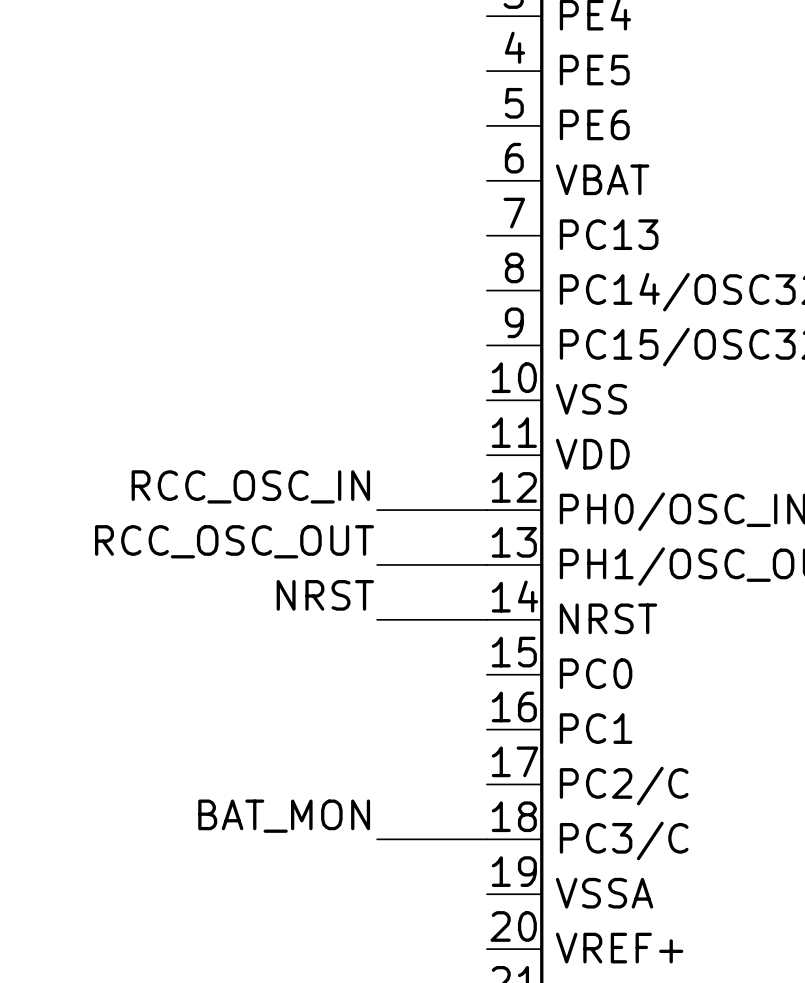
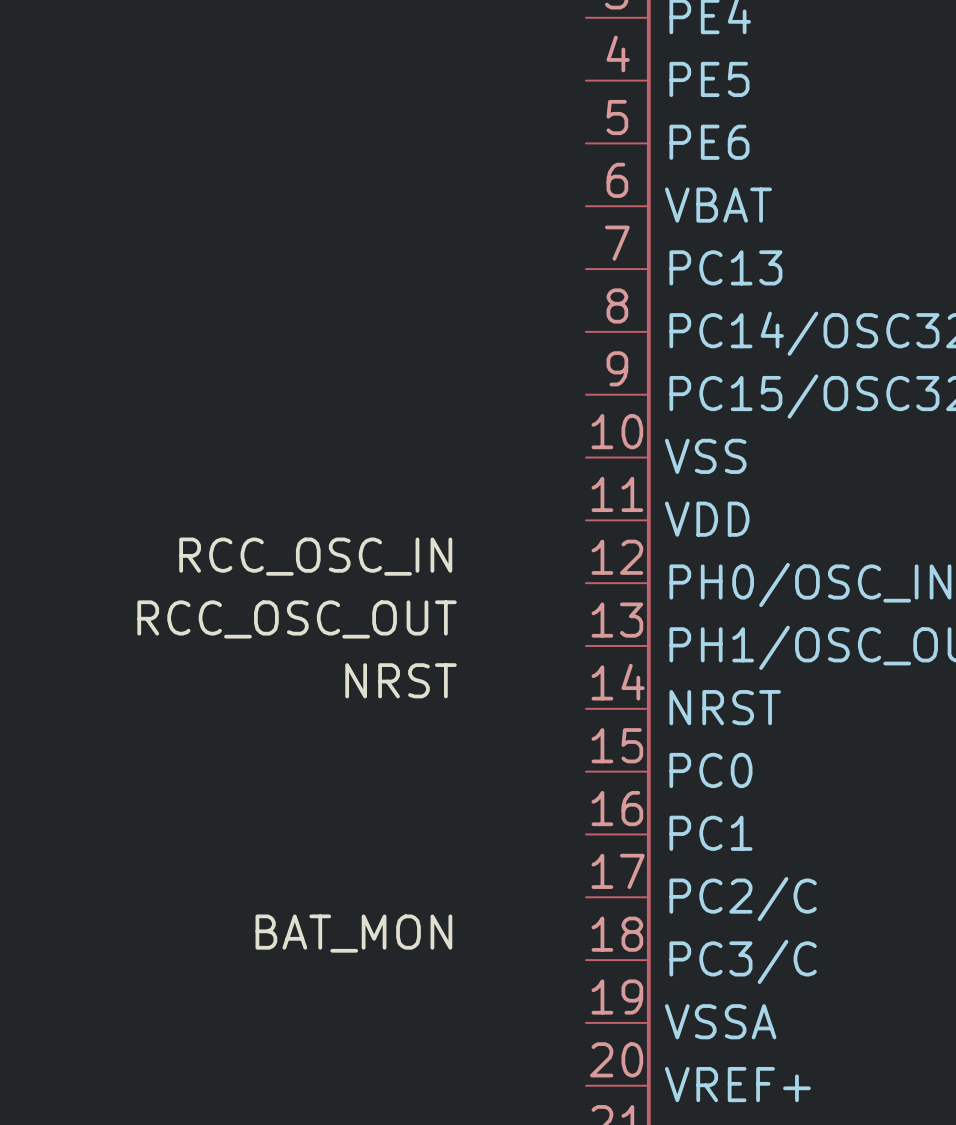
wire: (377, 510) (486, 510) -> none
wire: (377, 564) (486, 564) -> none
wire: (377, 619) (486, 619) -> none
wire: (377, 839) (486, 839) -> none

